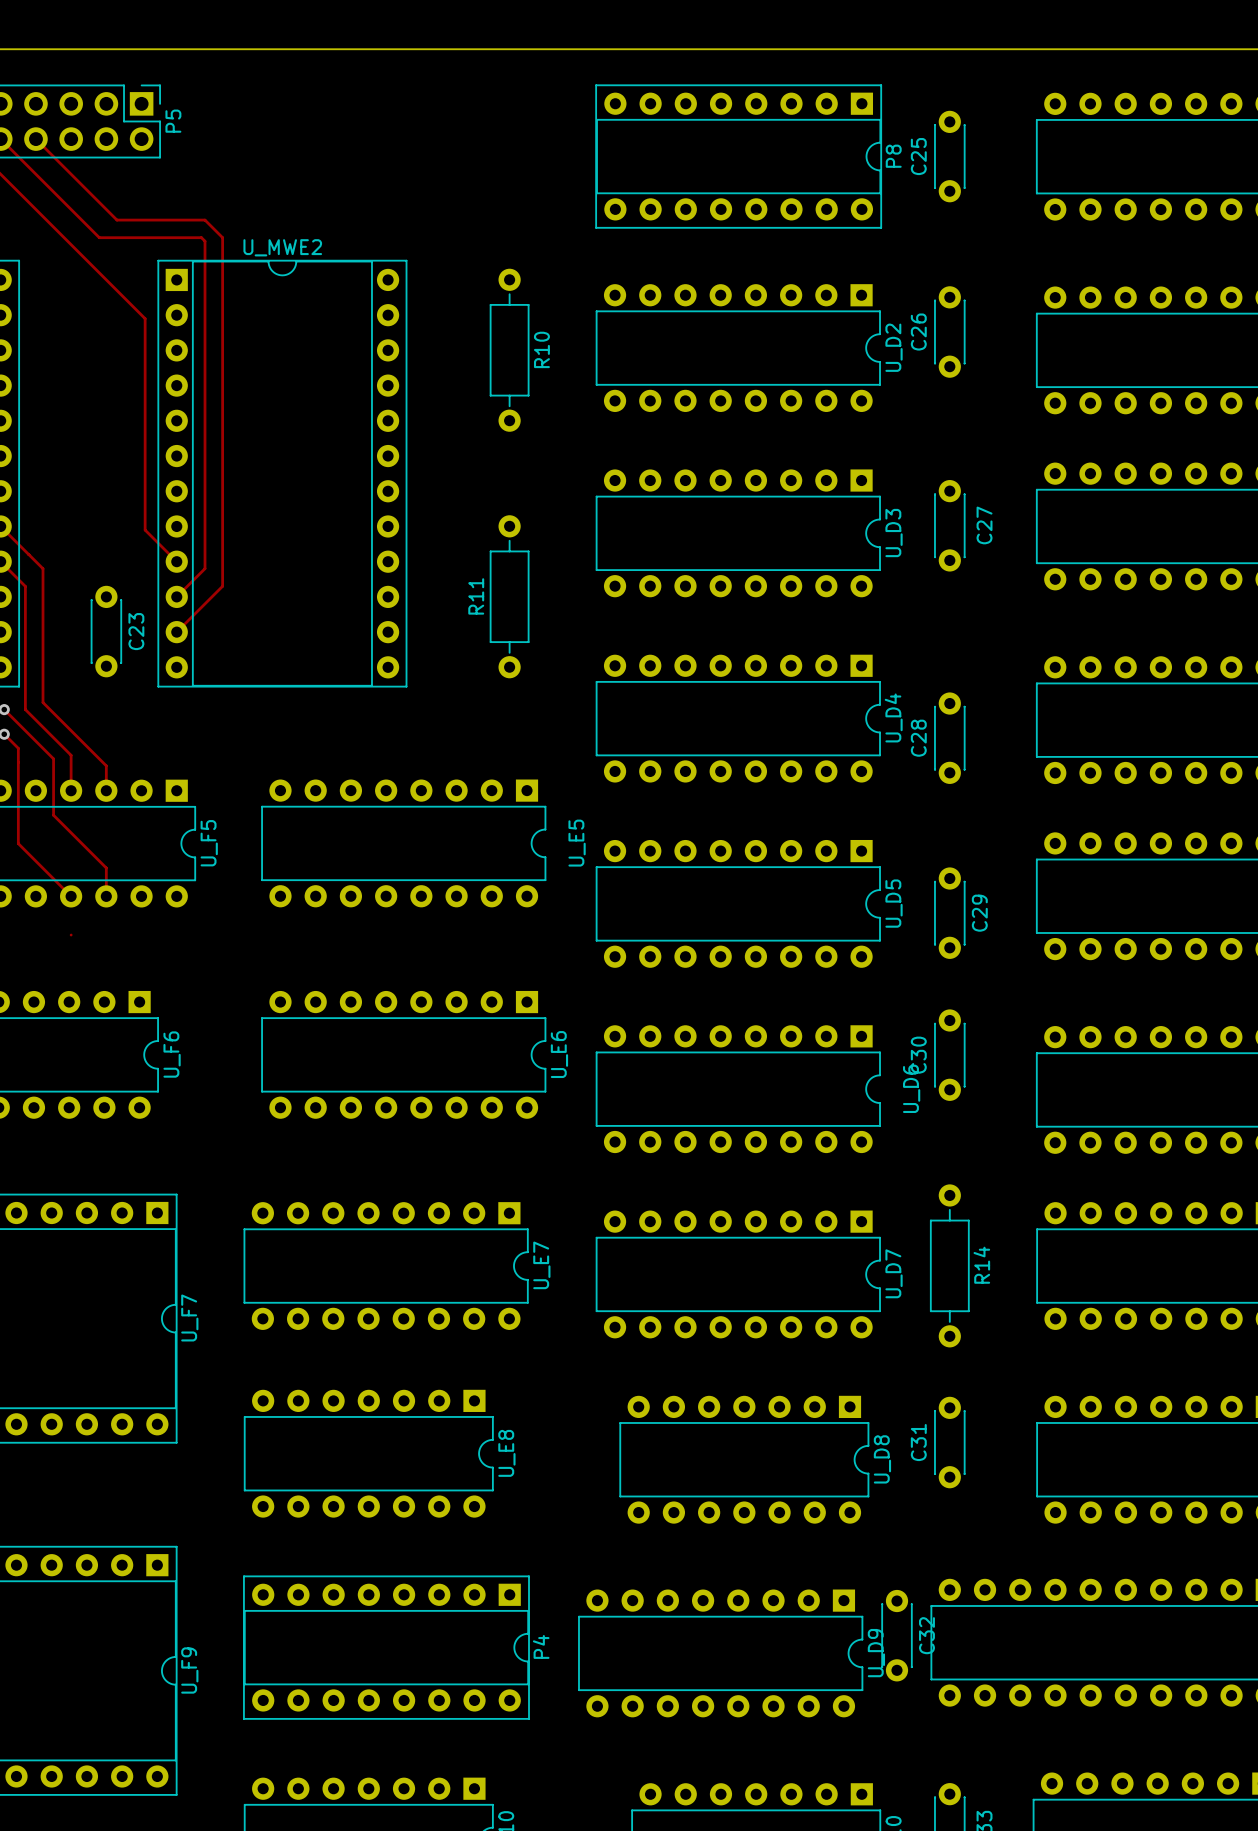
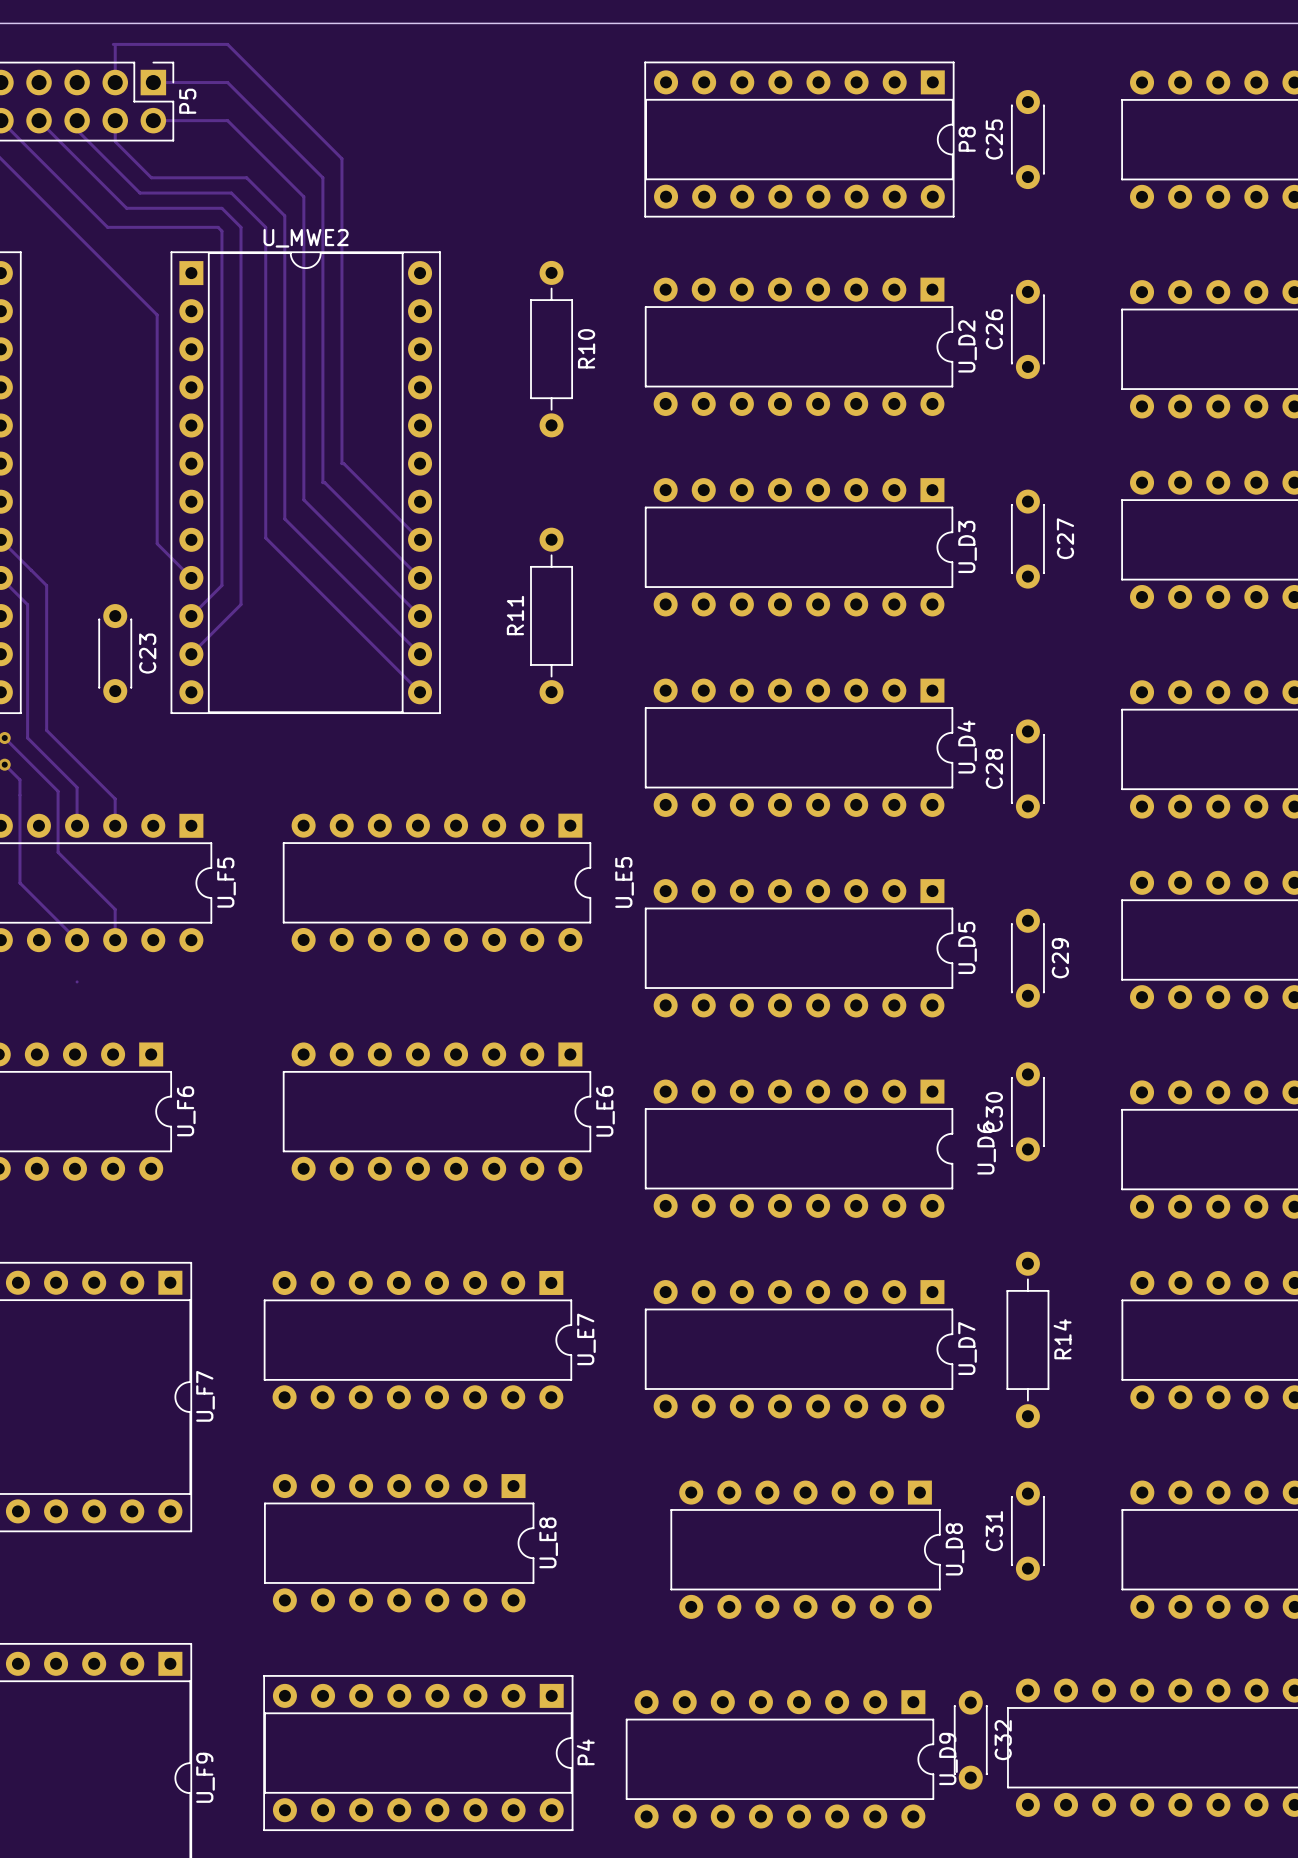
track: none -> (113, 44) (227, 44) (341, 158) (341, 463) (420, 539)
track: none -> (115, 46) (115, 82)
track: none -> (153, 82) (227, 82) (322, 177) (322, 482) (420, 577)
track: none -> (77, 120) (77, 130) (139, 193) (231, 193) (265, 227) (265, 537) (420, 692)
track: none -> (115, 120) (115, 141) (151, 177) (246, 177) (284, 215) (284, 518) (420, 654)
track: none -> (153, 120) (227, 120) (303, 196) (303, 499) (420, 616)

